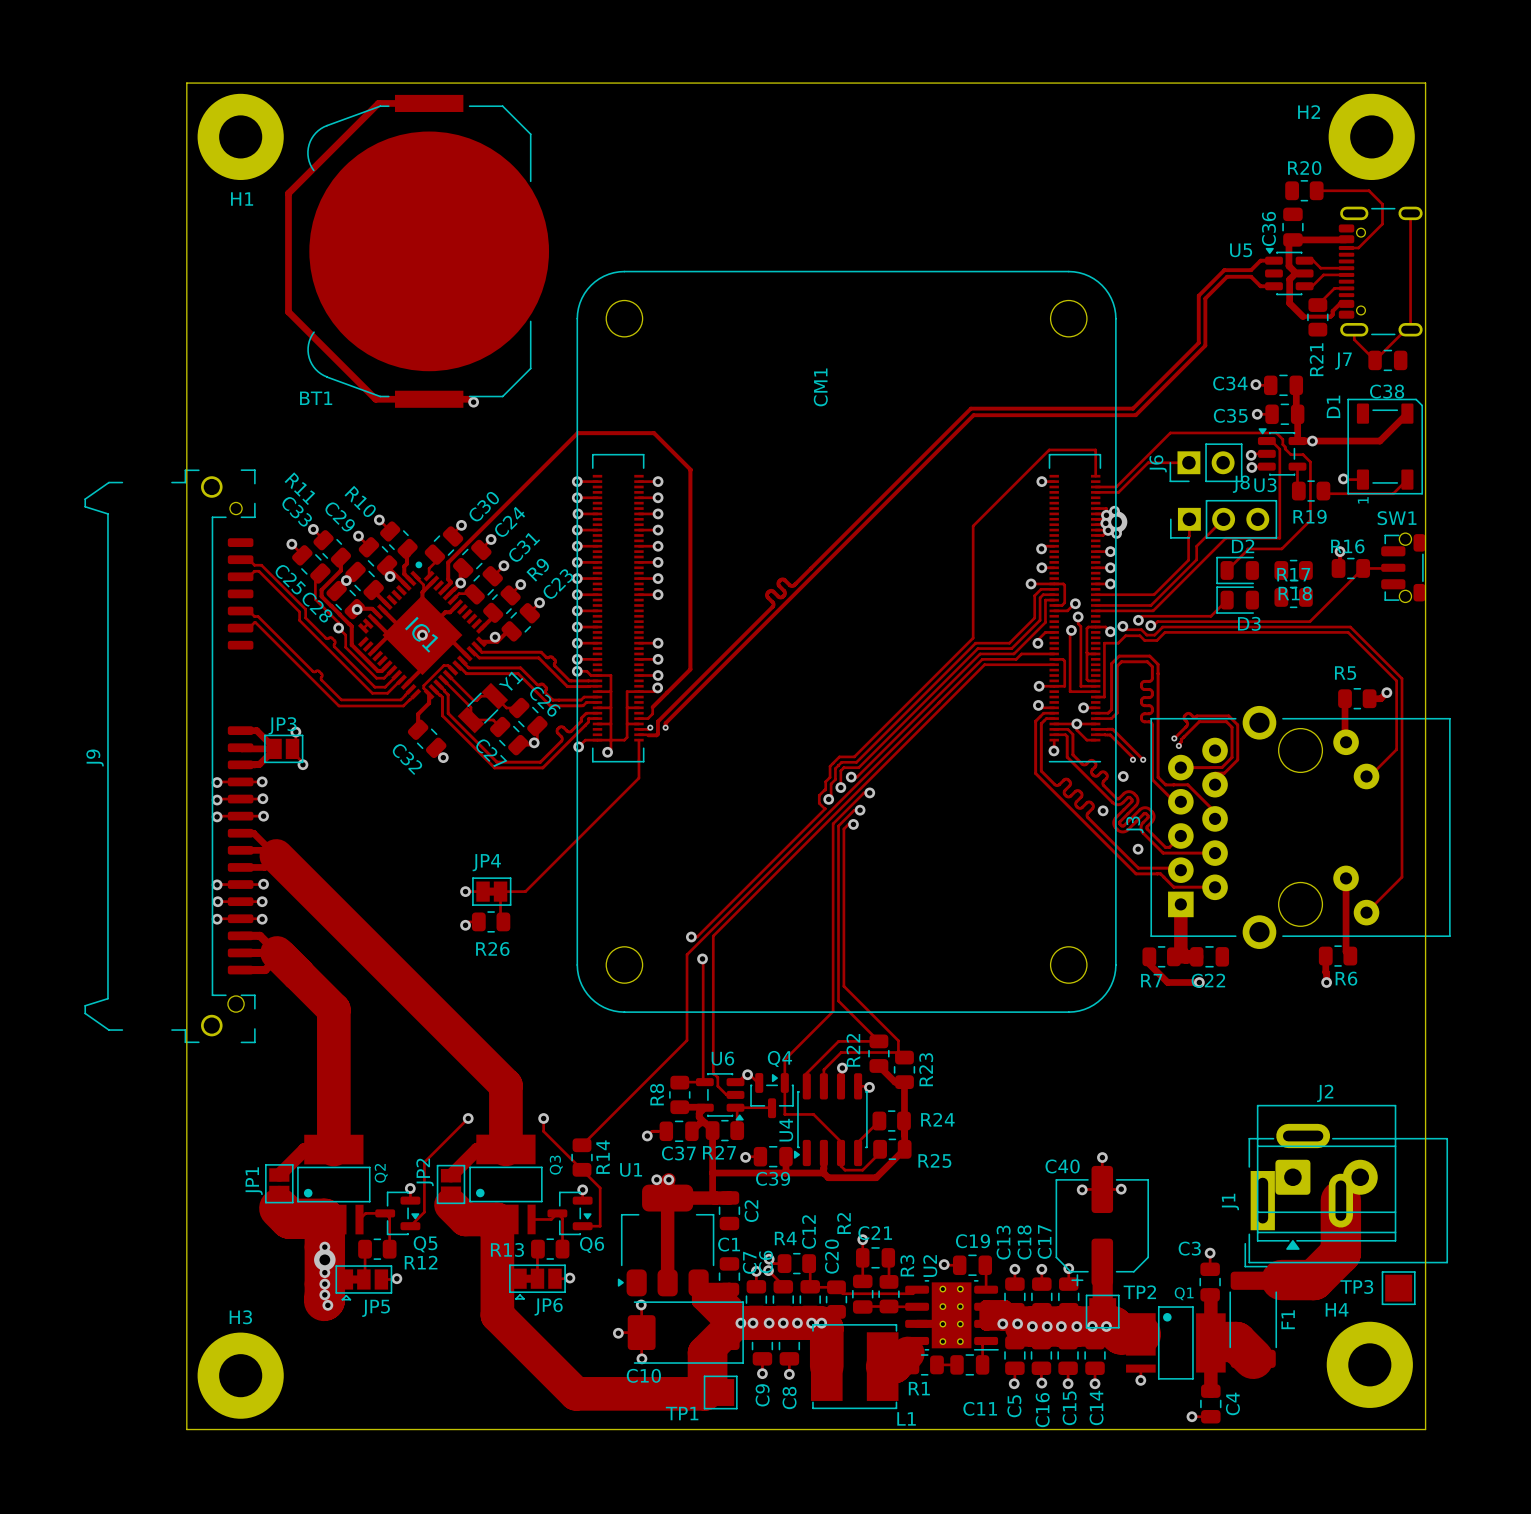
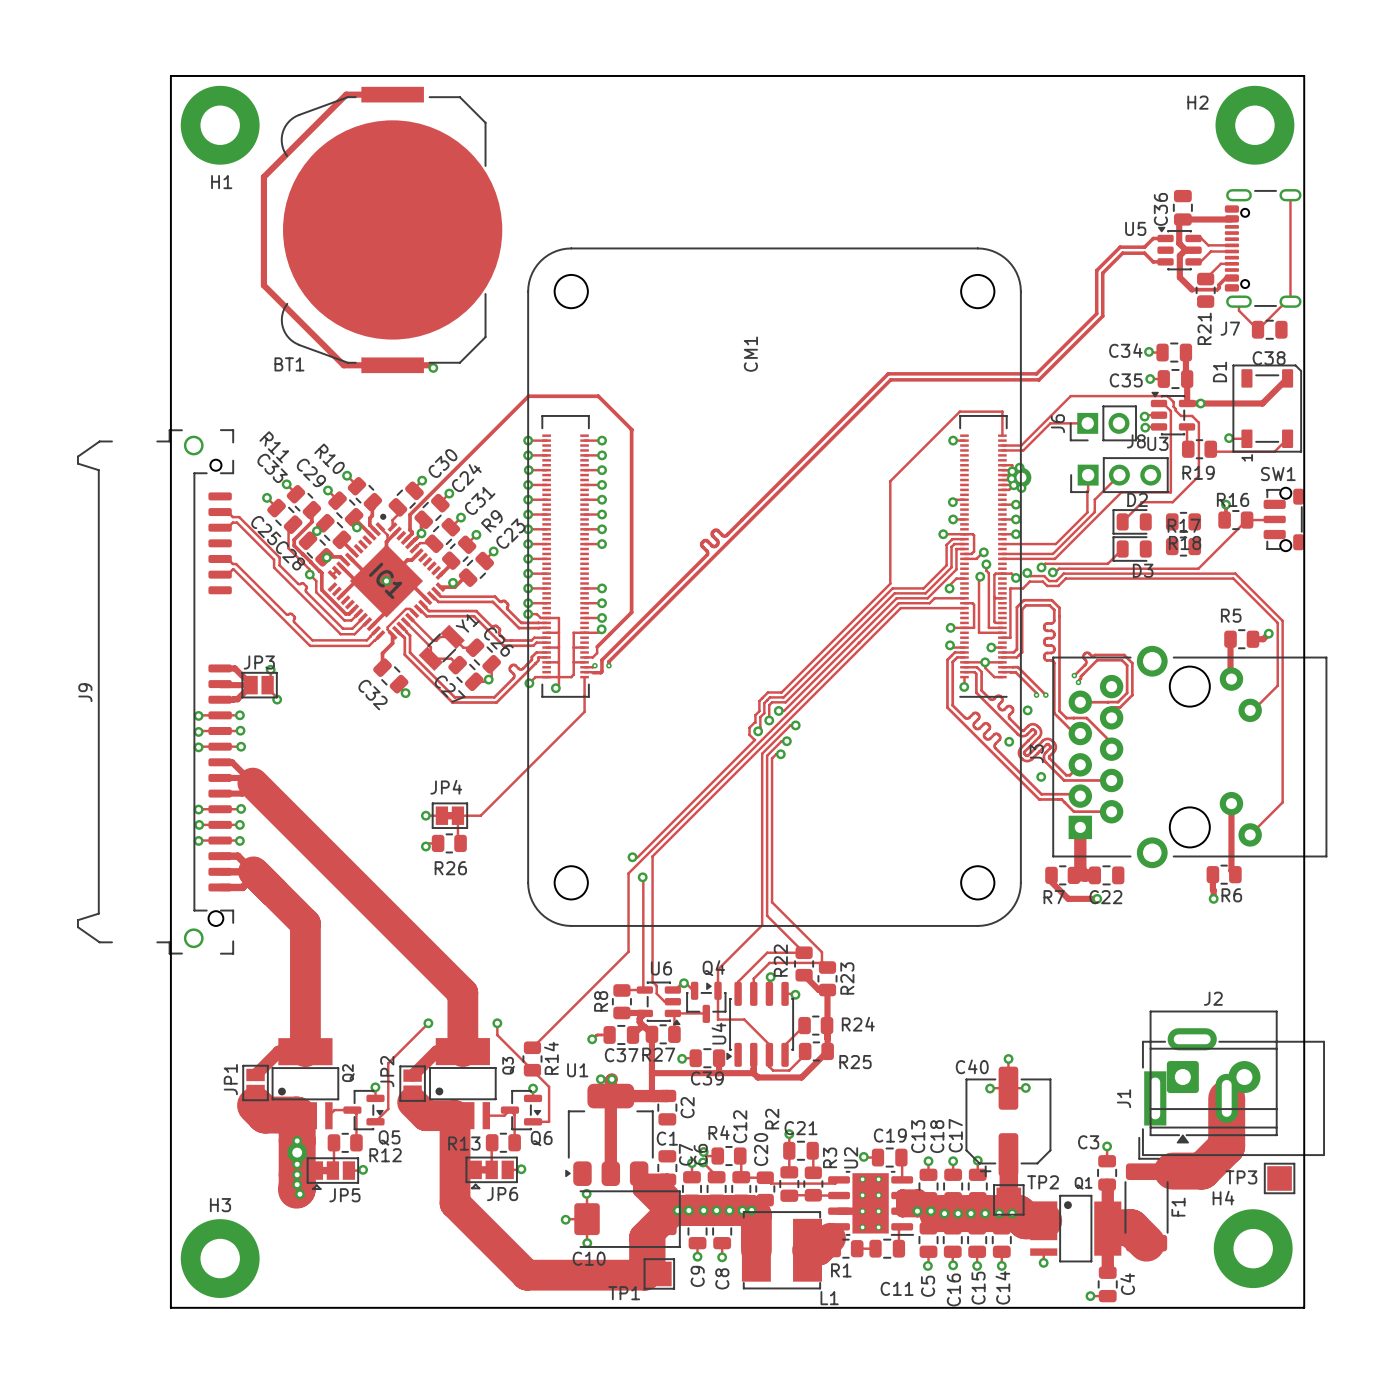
R20: (1304, 190) -> none
track: (1316, 190) (1369, 190) (1382, 204) (1382, 224) (1358, 247) (1346, 247) -> none

